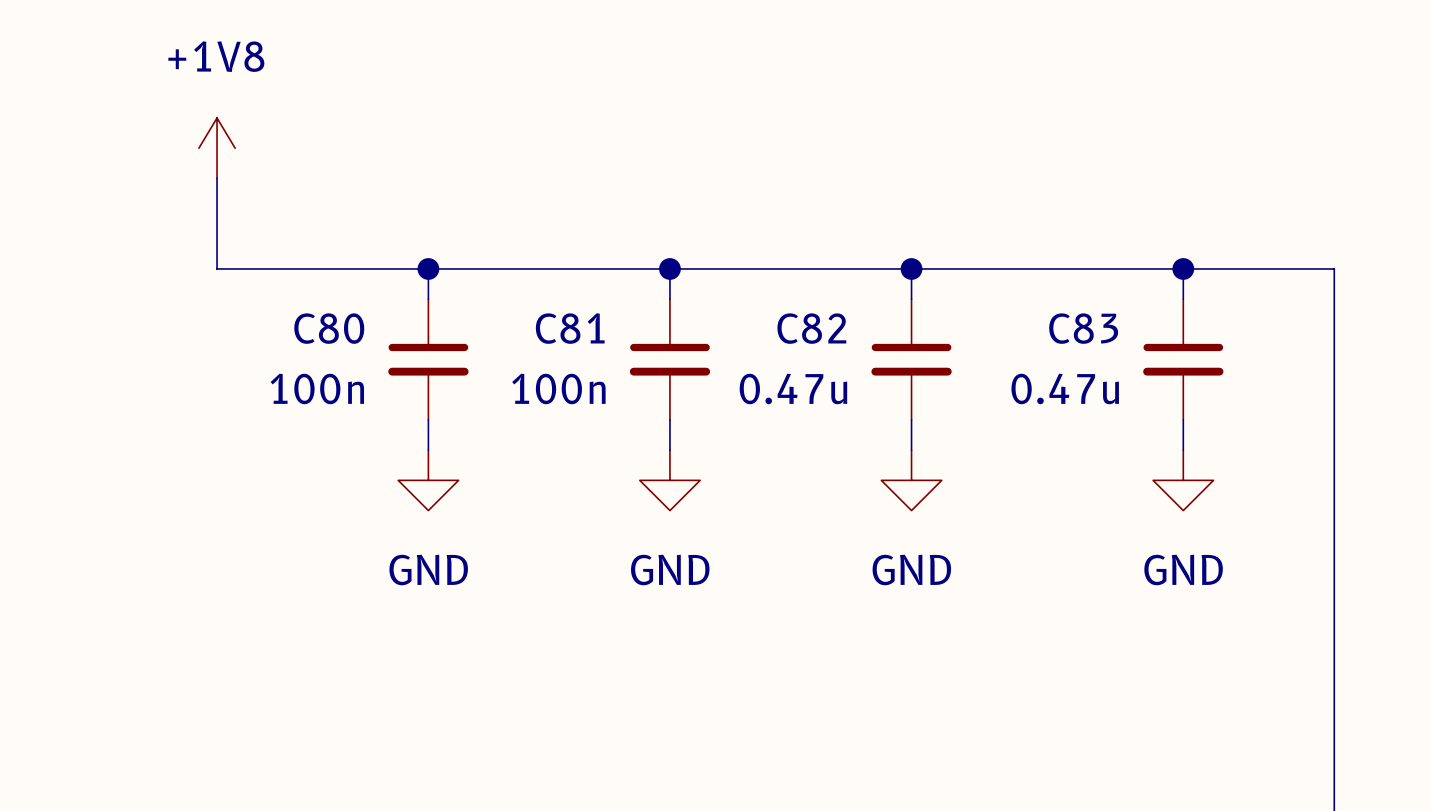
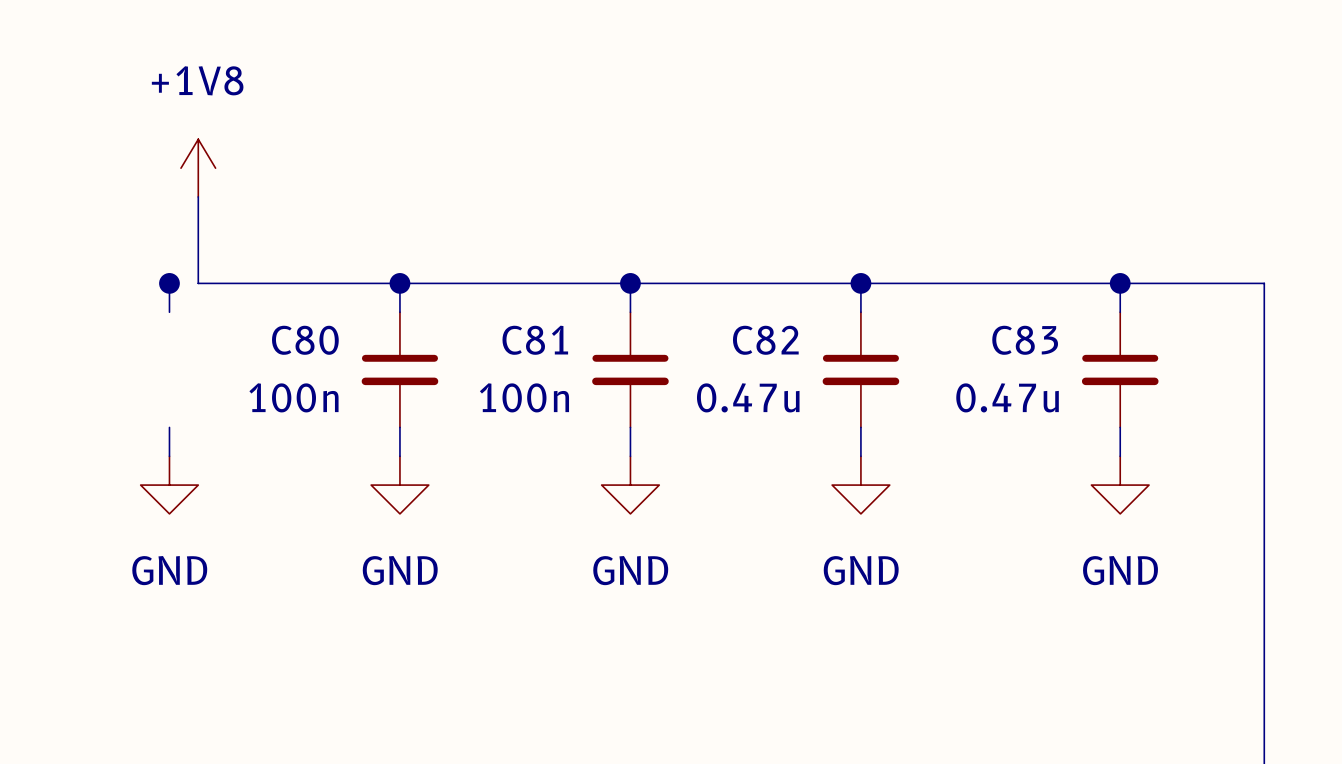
wire: none -> (169, 283) (169, 312)
junction: none -> (169, 283)
wire: none -> (169, 427) (169, 456)
power symbol: none -> GND (169, 485)

